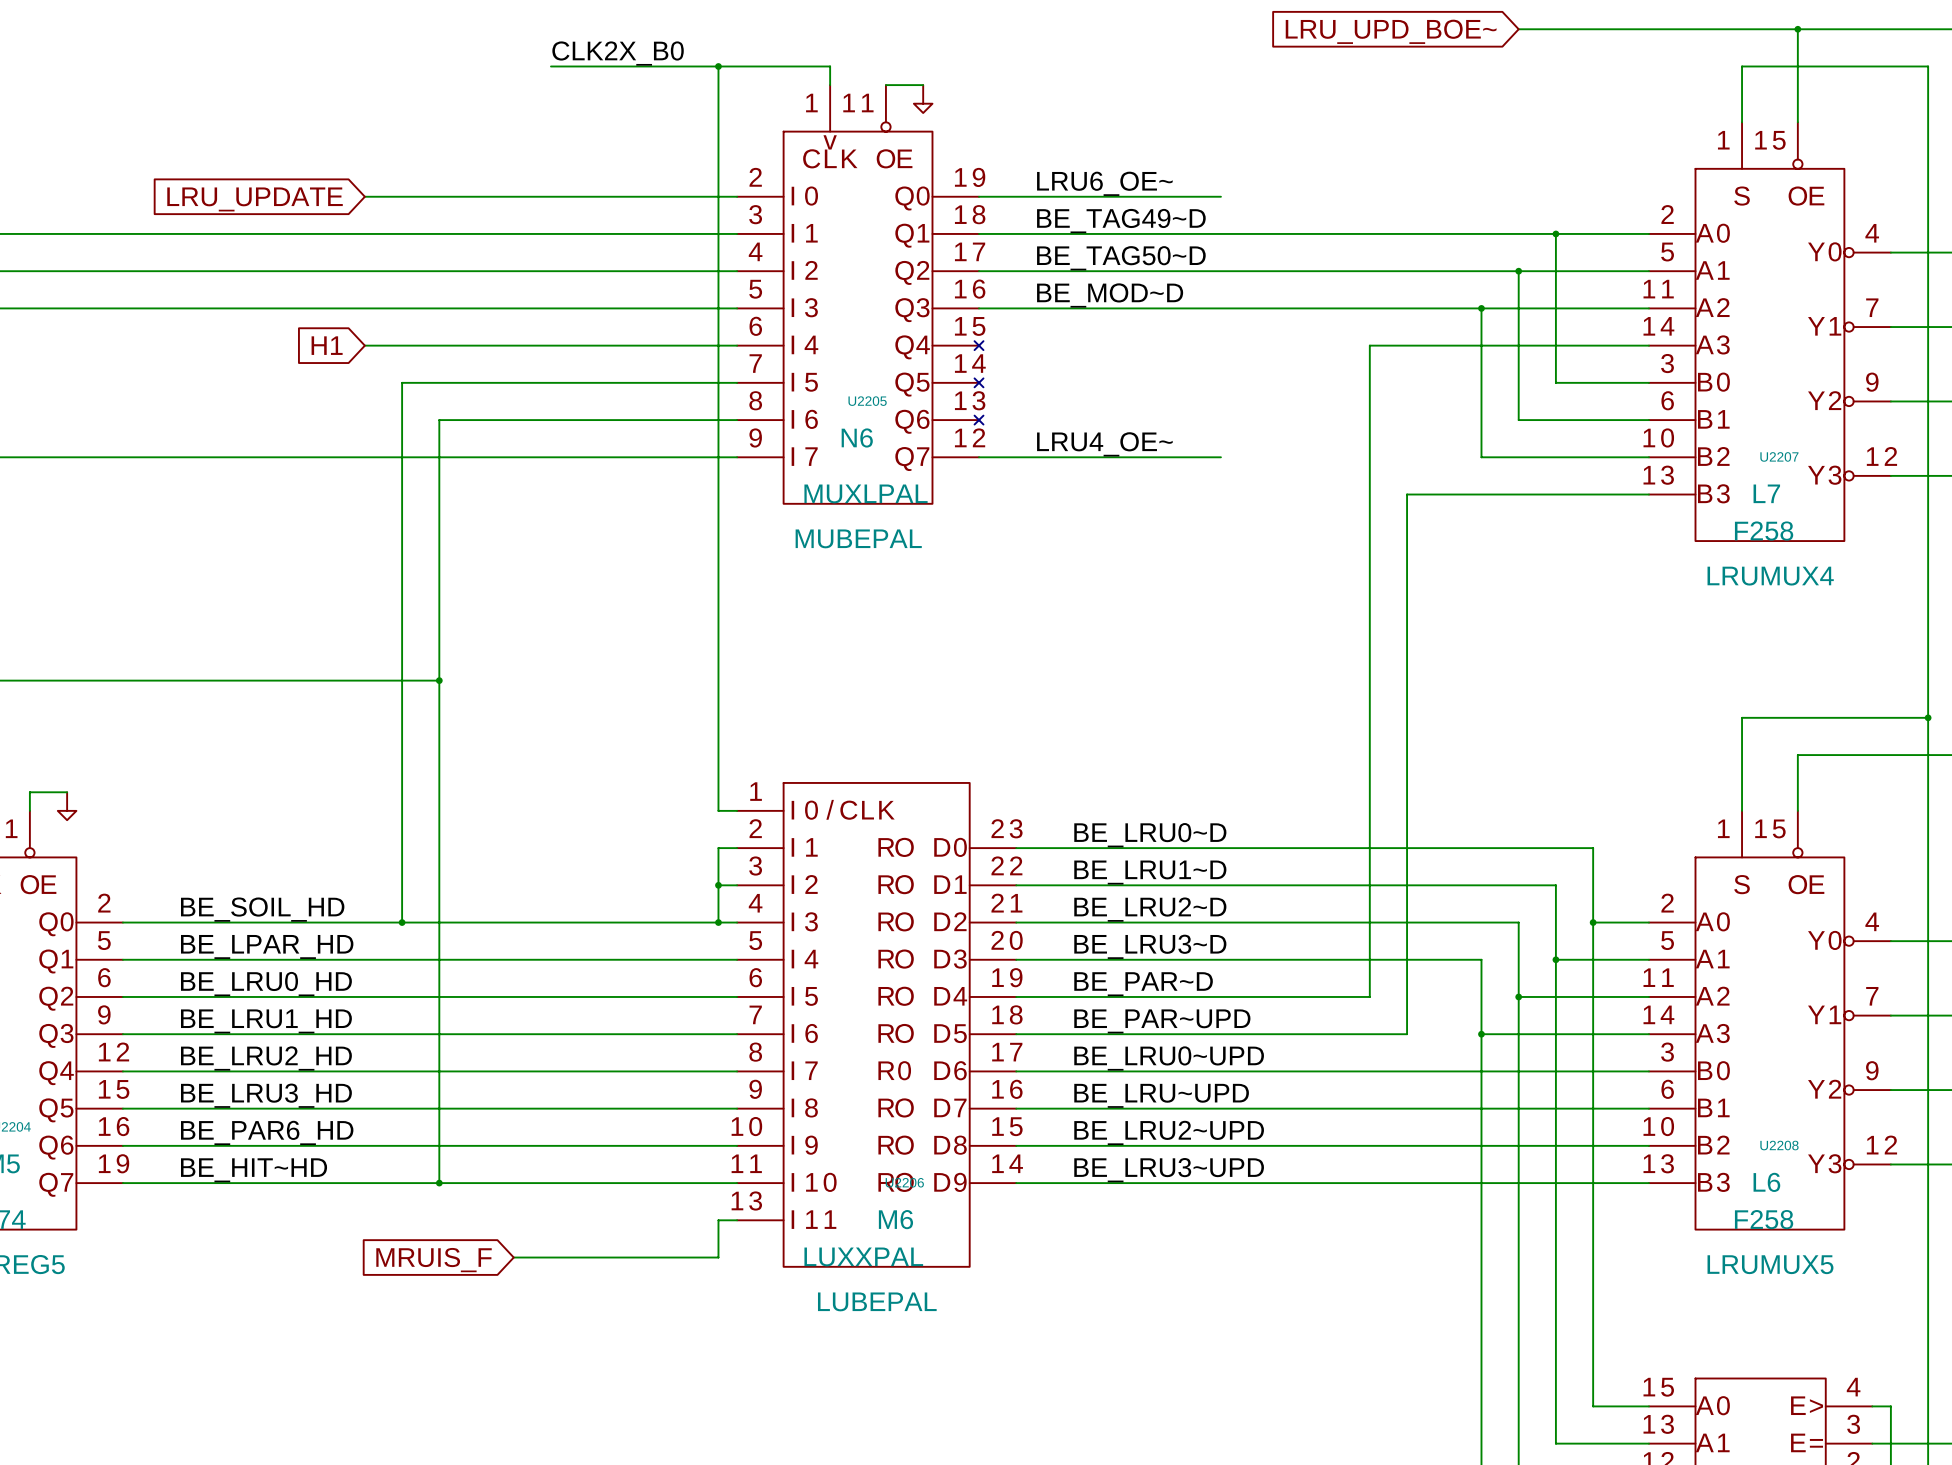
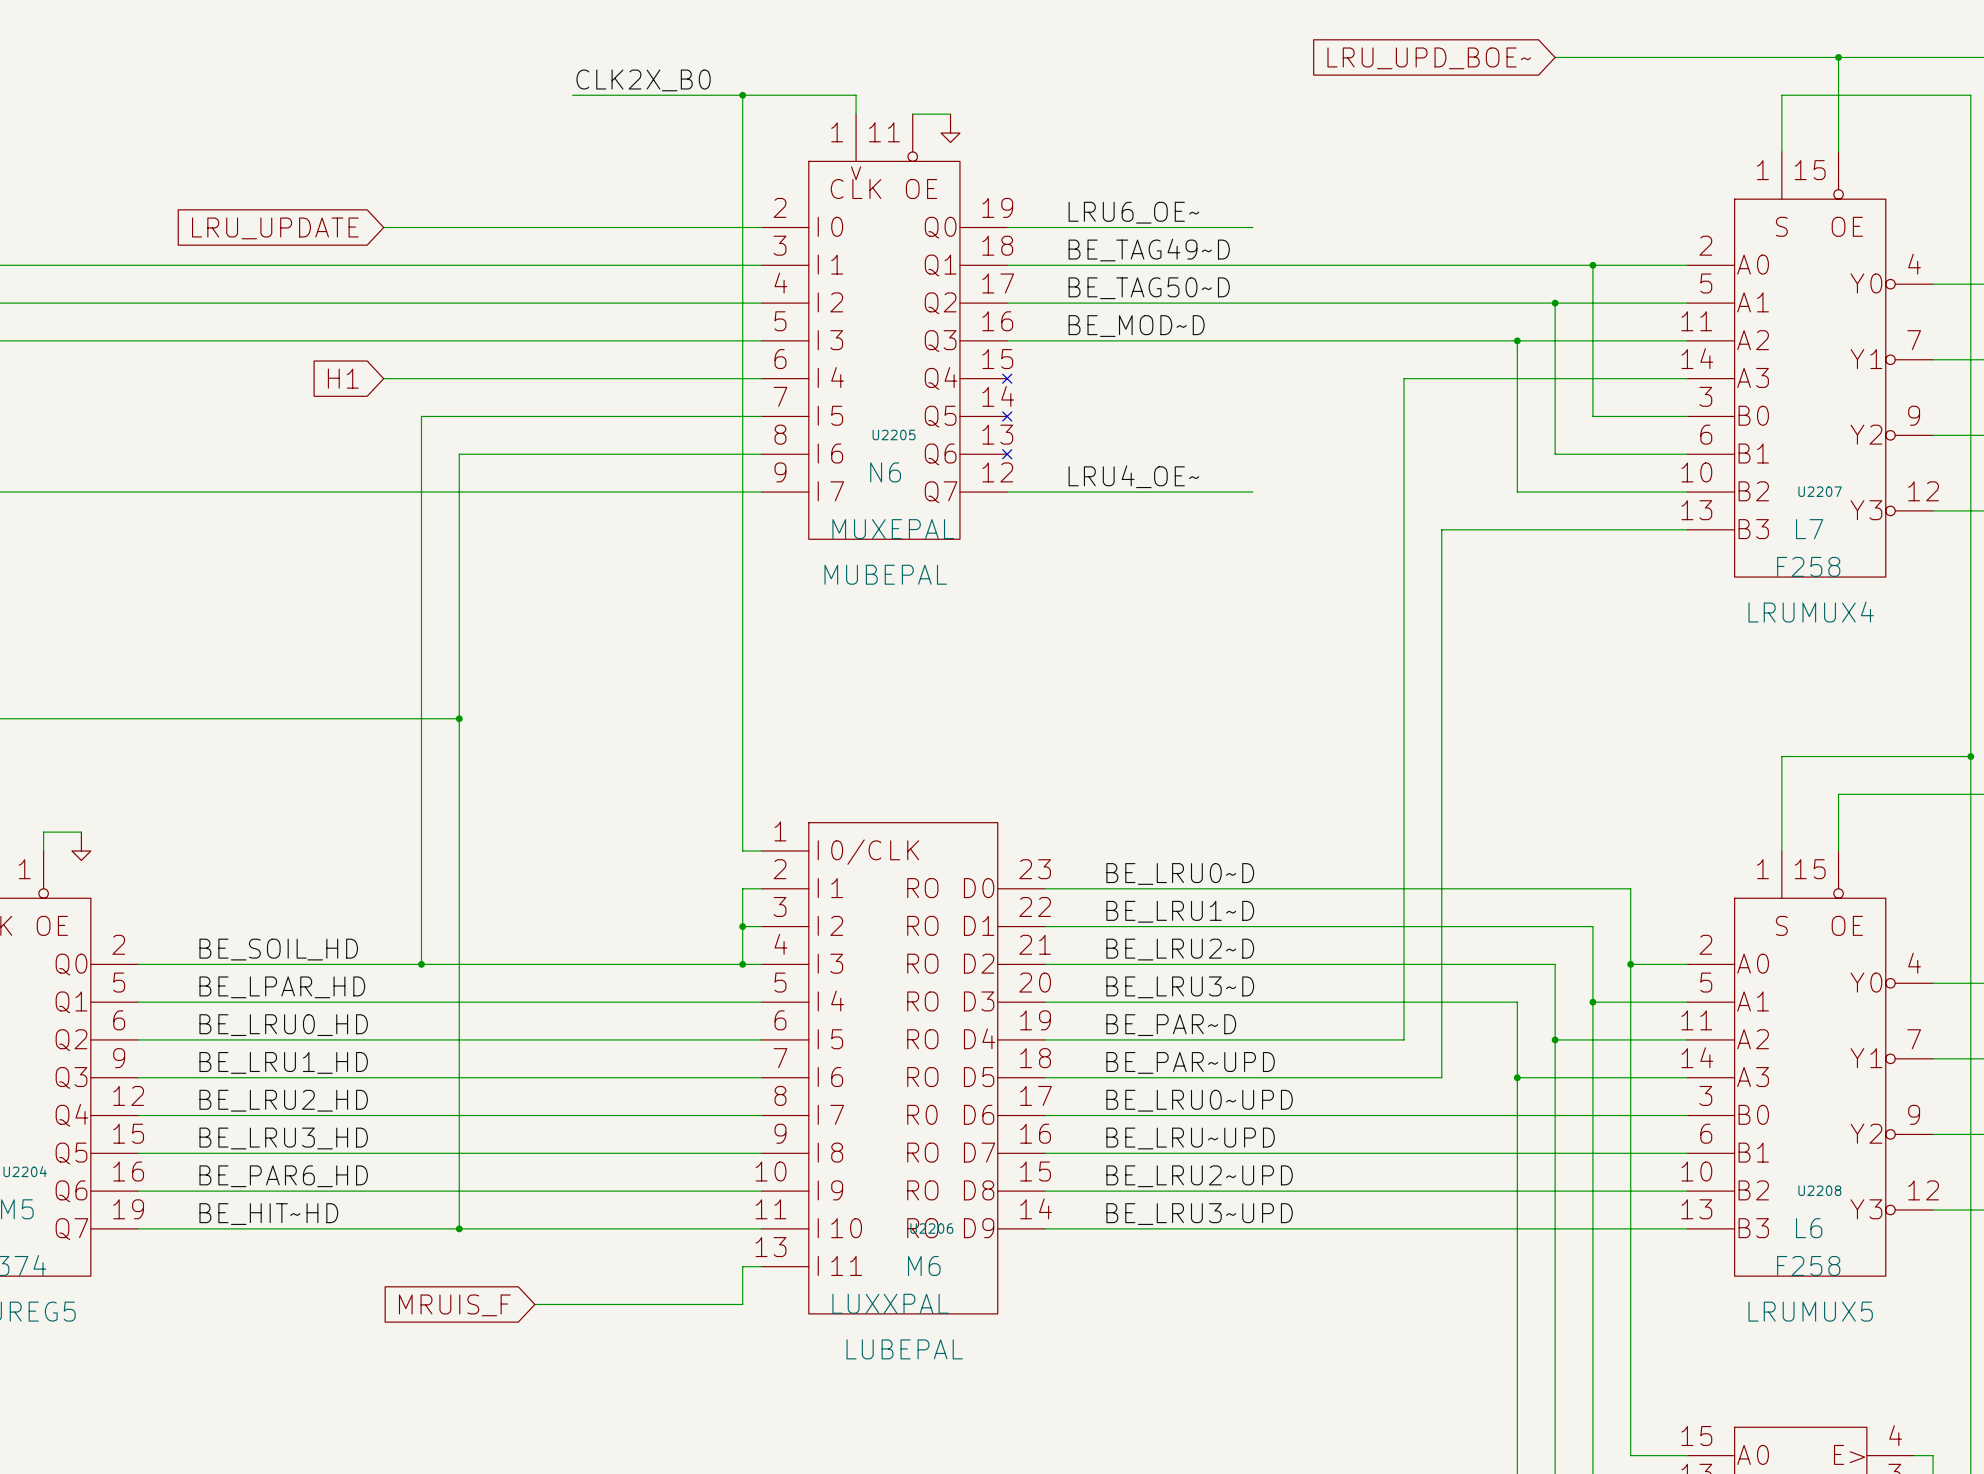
U2205 value: MUXLPAL (866, 493) -> MUXEPAL (893, 529)

